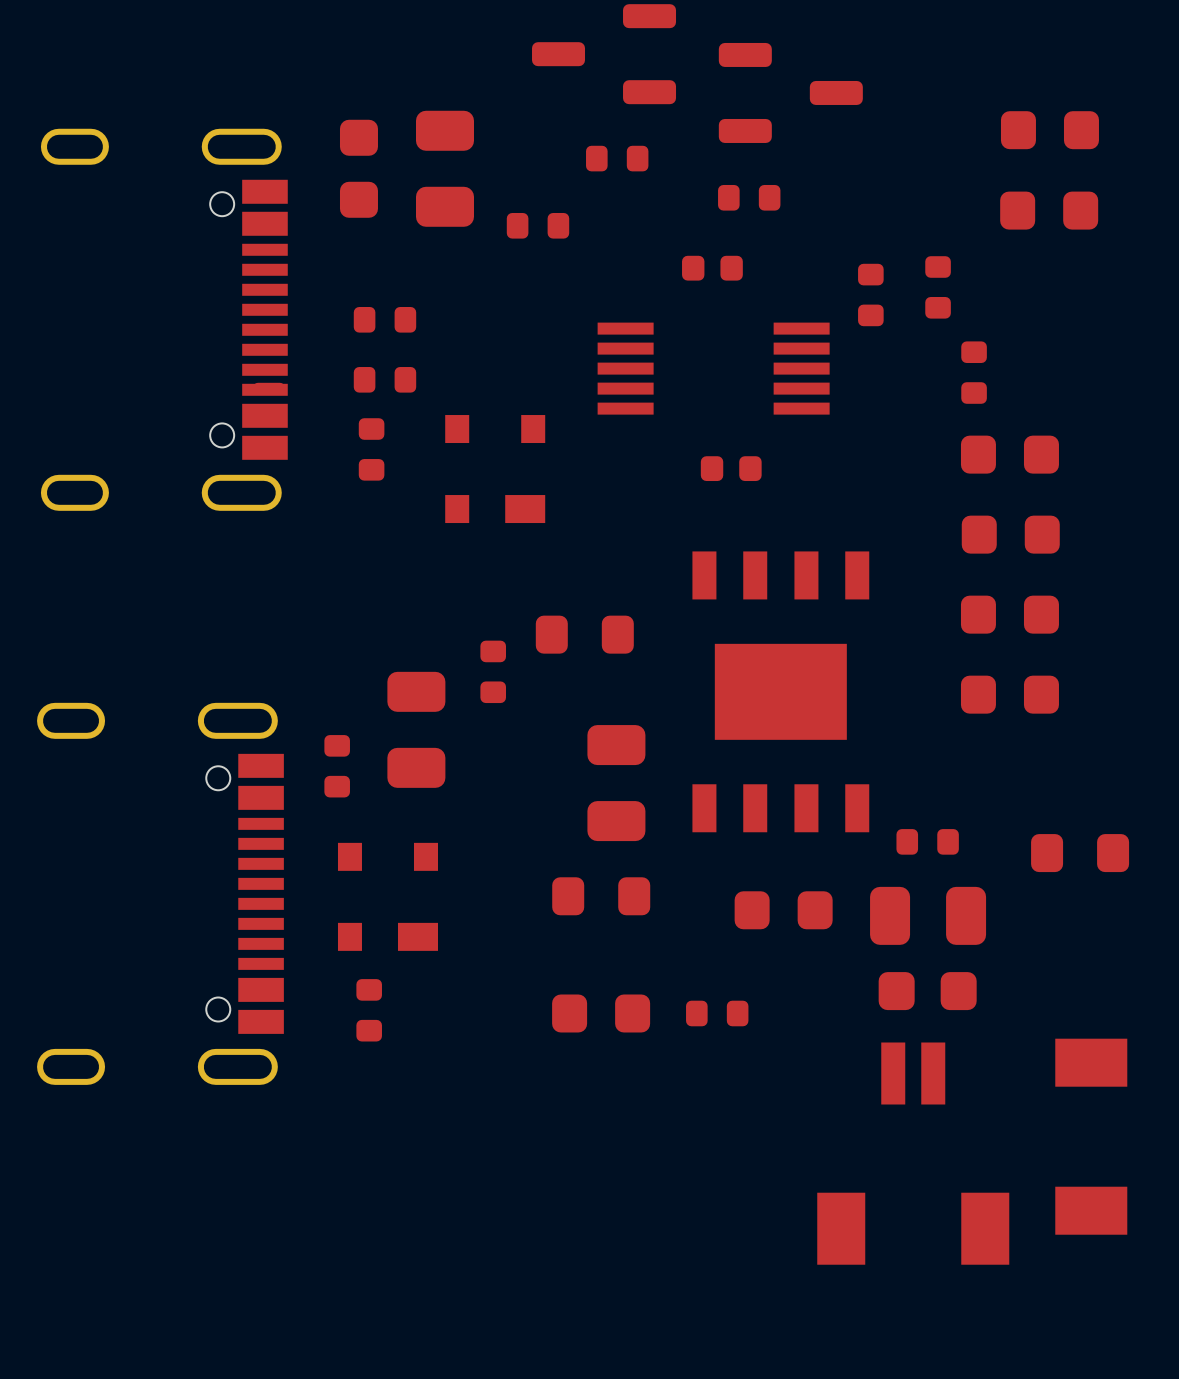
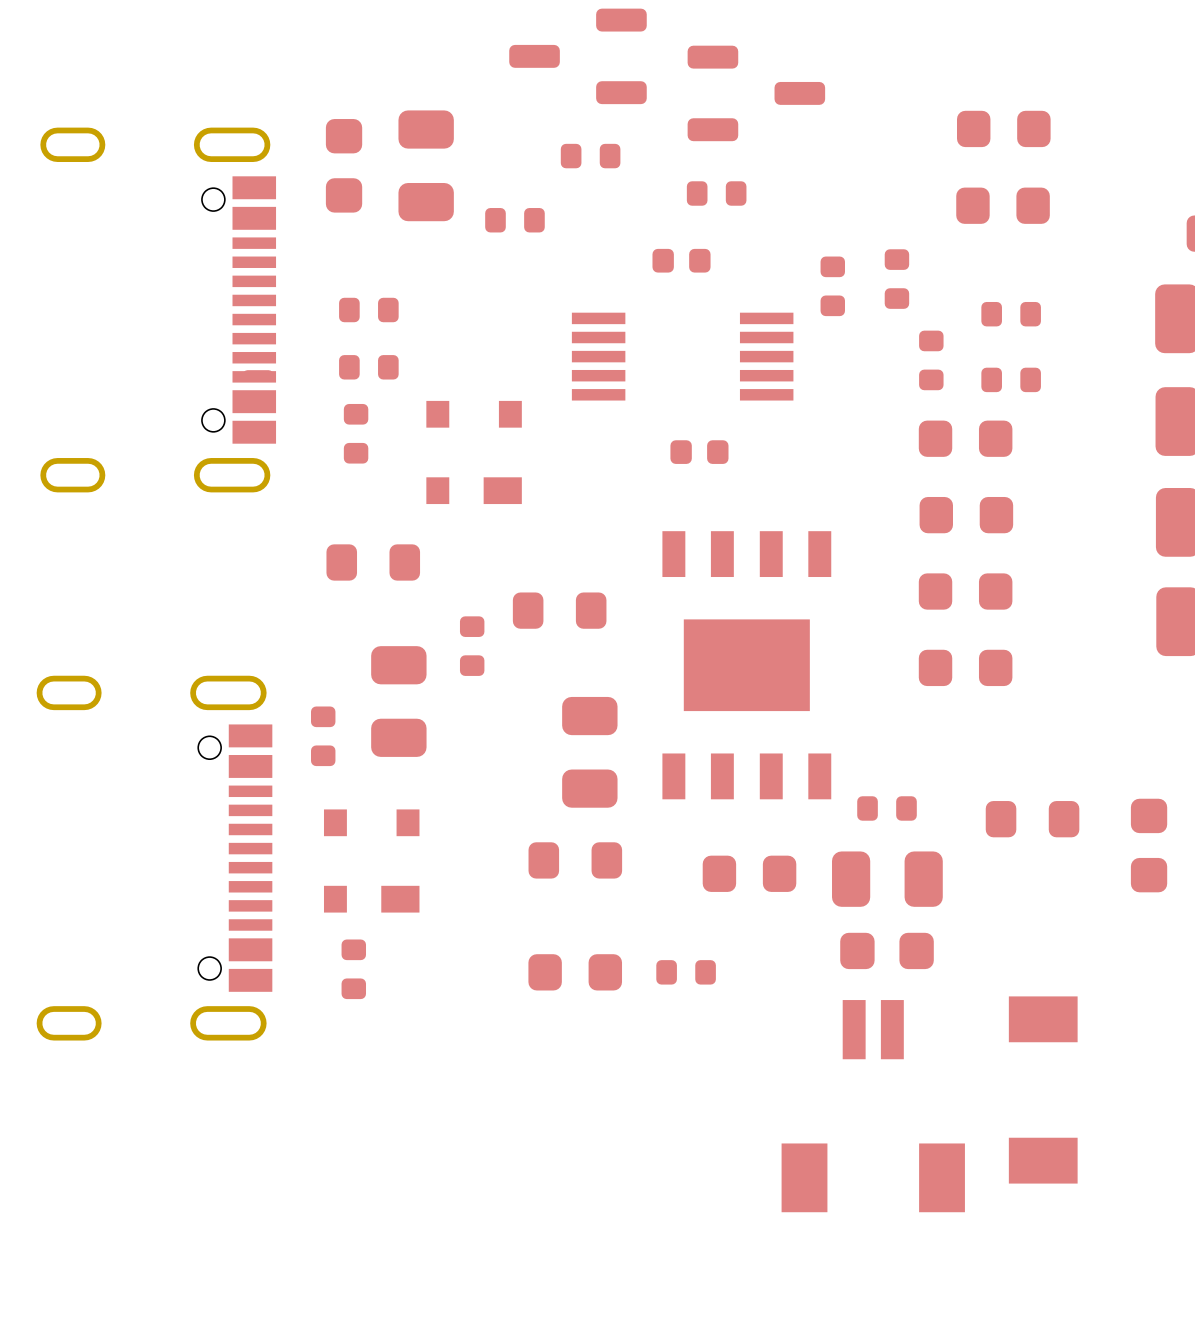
part: none -> (1011, 314)
part: none -> (1011, 379)
part: none -> (373, 562)

